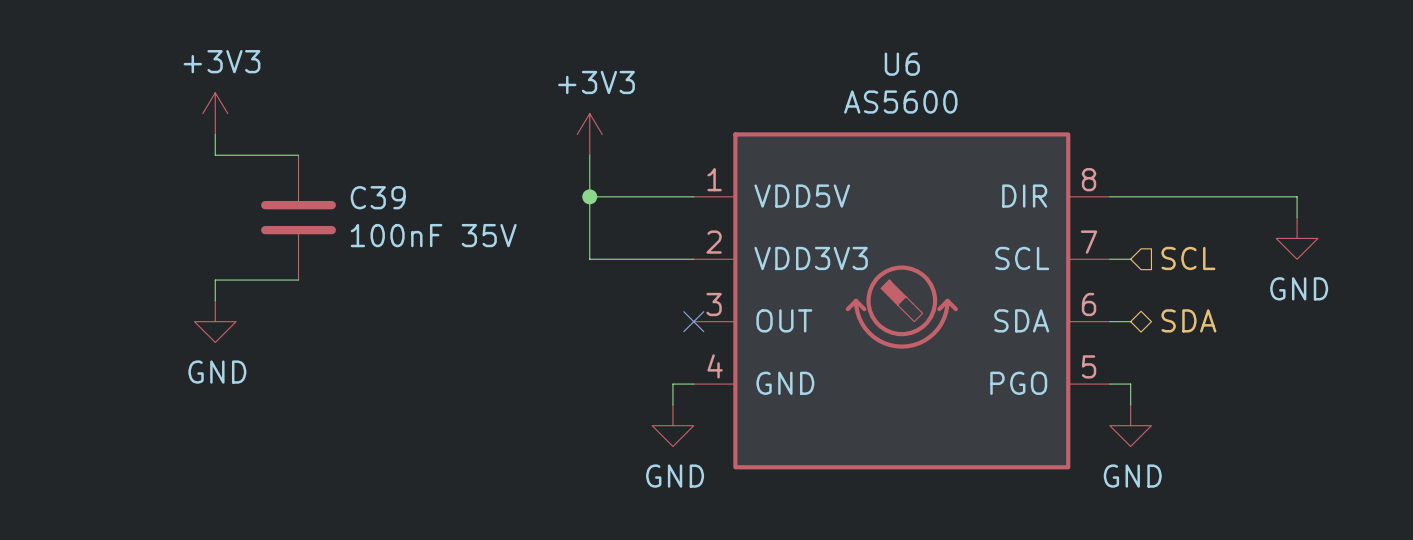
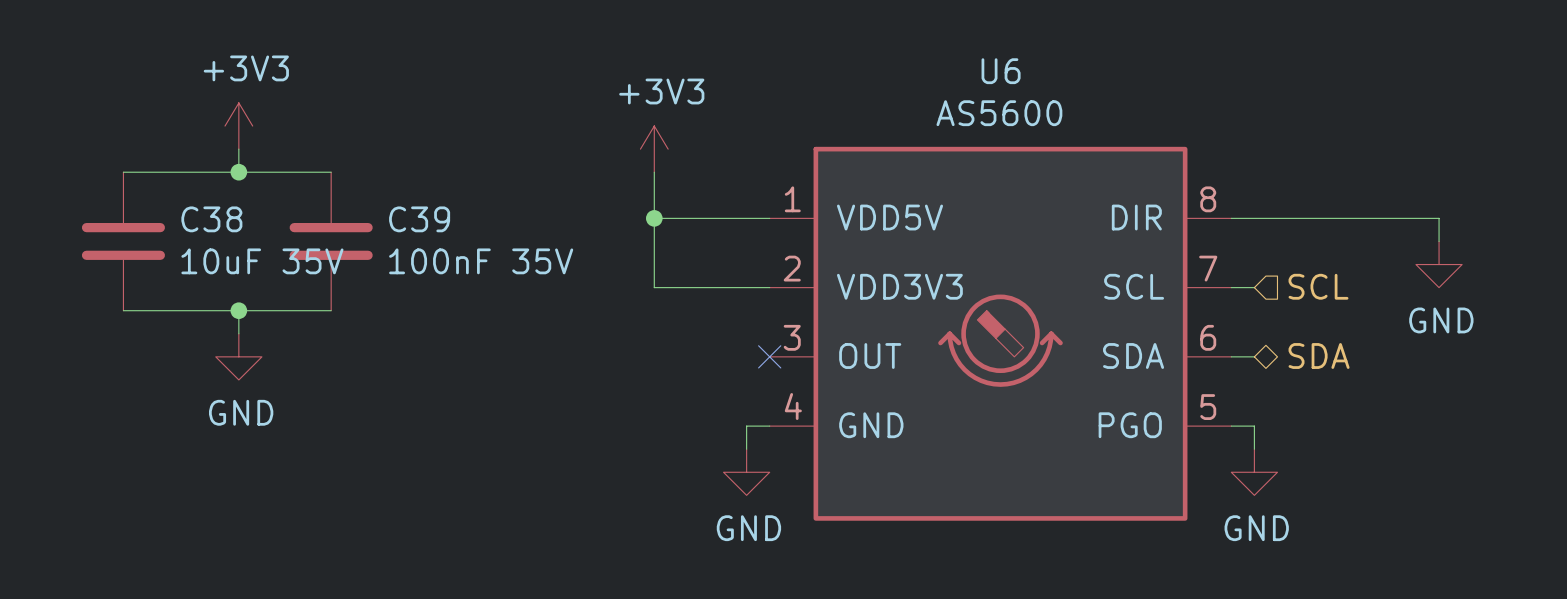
wire: none -> (123, 172) (238, 172)
junction: none -> (238, 172)
C38: none -> 10uF 35V (123, 241)
wire: none -> (123, 310) (238, 310)
junction: none -> (238, 310)

